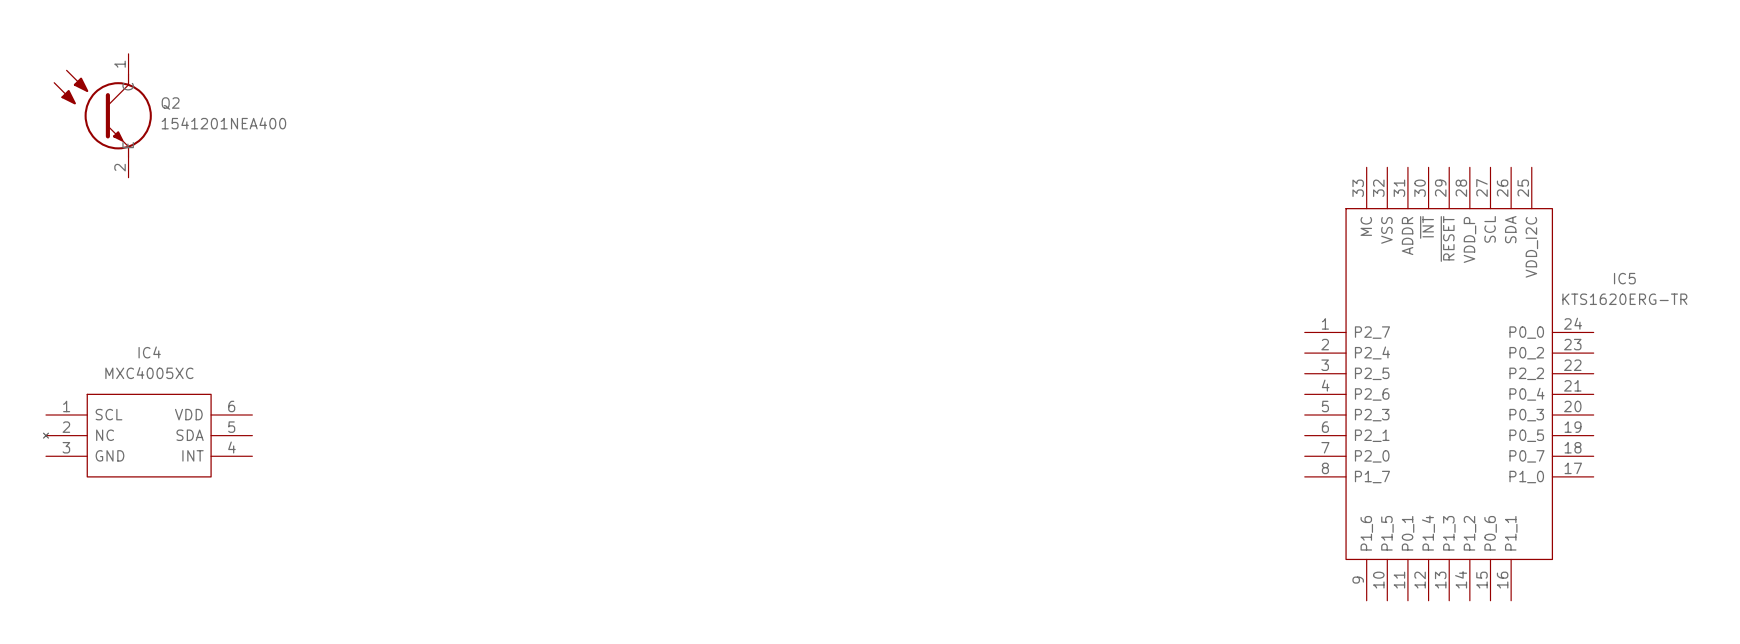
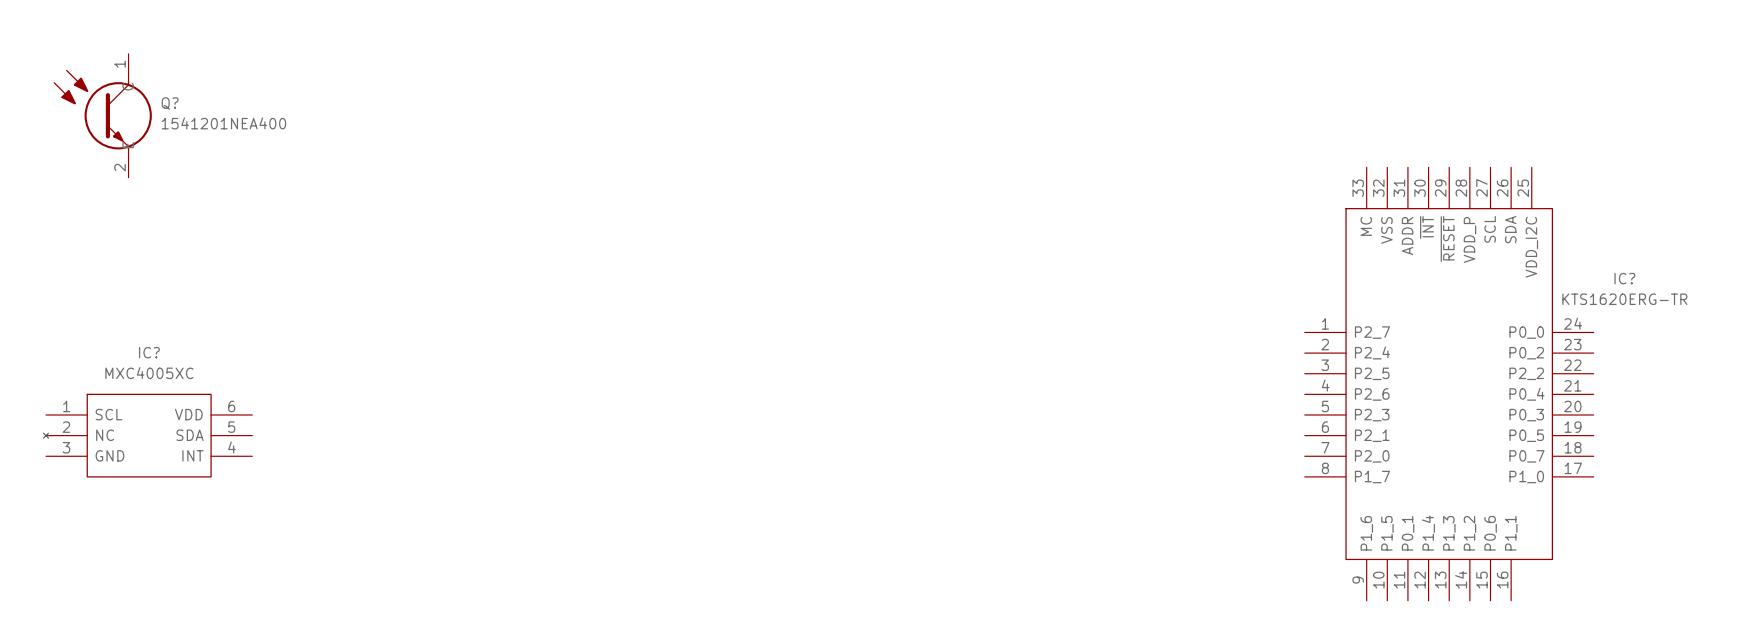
Q2 name: Q2 (170, 103) -> Q? (170, 103)
IC5 name: IC5 (1624, 278) -> IC? (1624, 278)
IC4 name: IC4 (149, 352) -> IC? (149, 352)

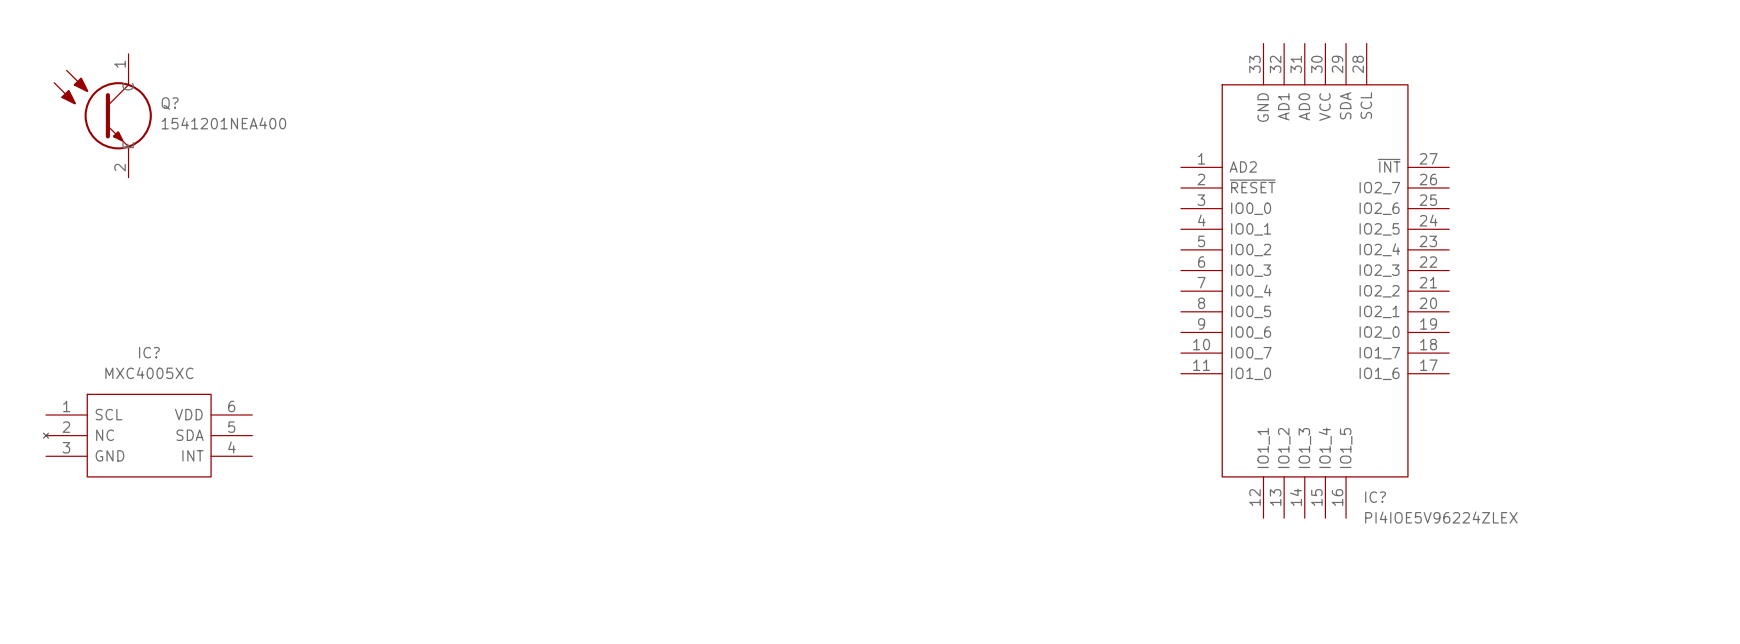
IC?: none -> PI4IOE5V96224ZLEX (1315, 280)
IC?: KTS1620ERG-TR (1449, 384) -> none

